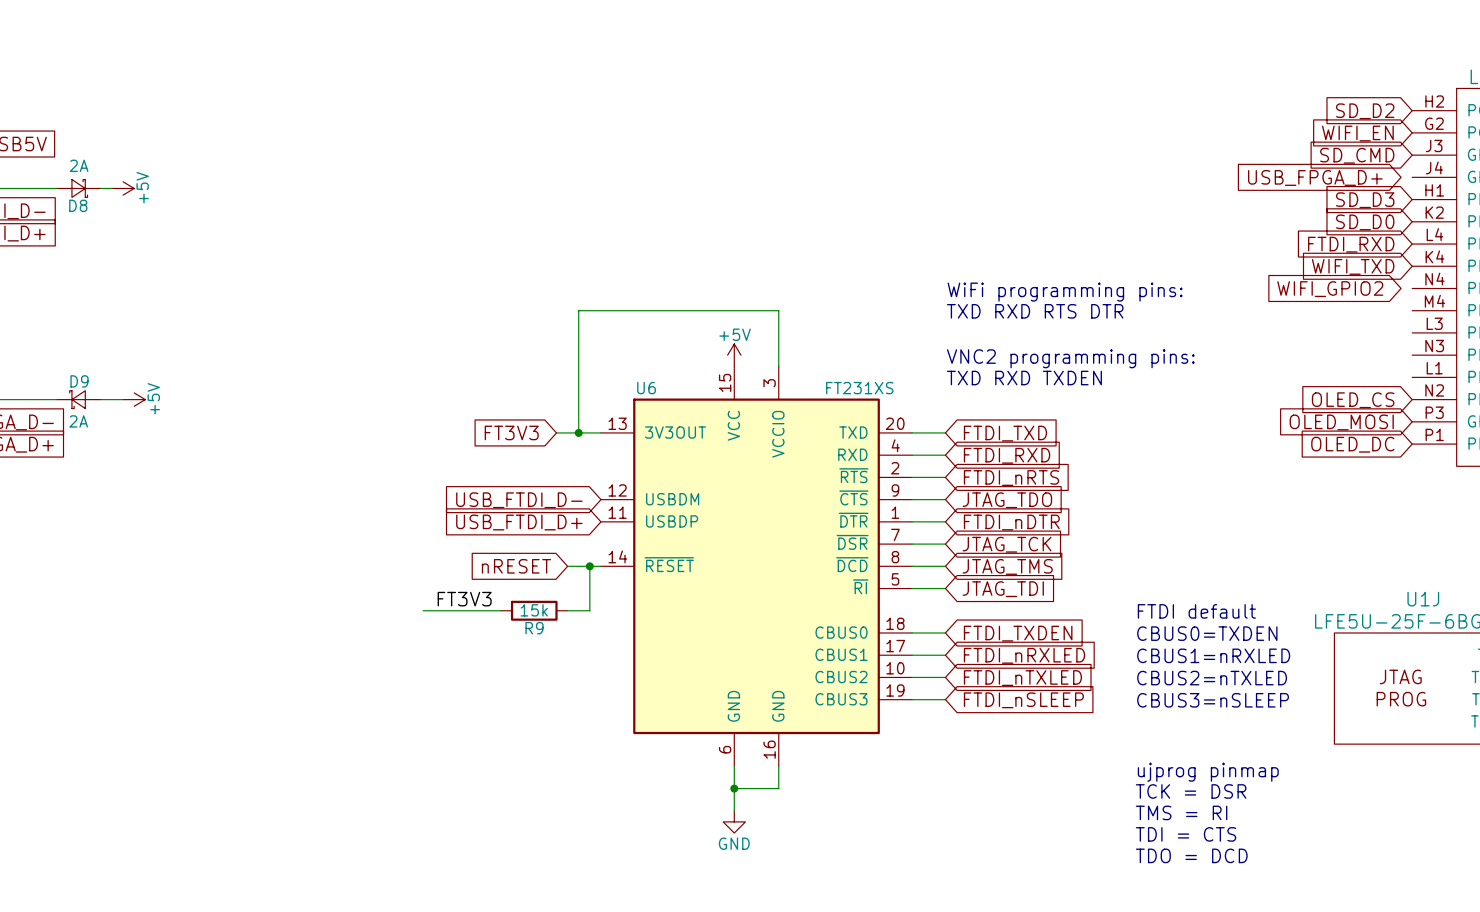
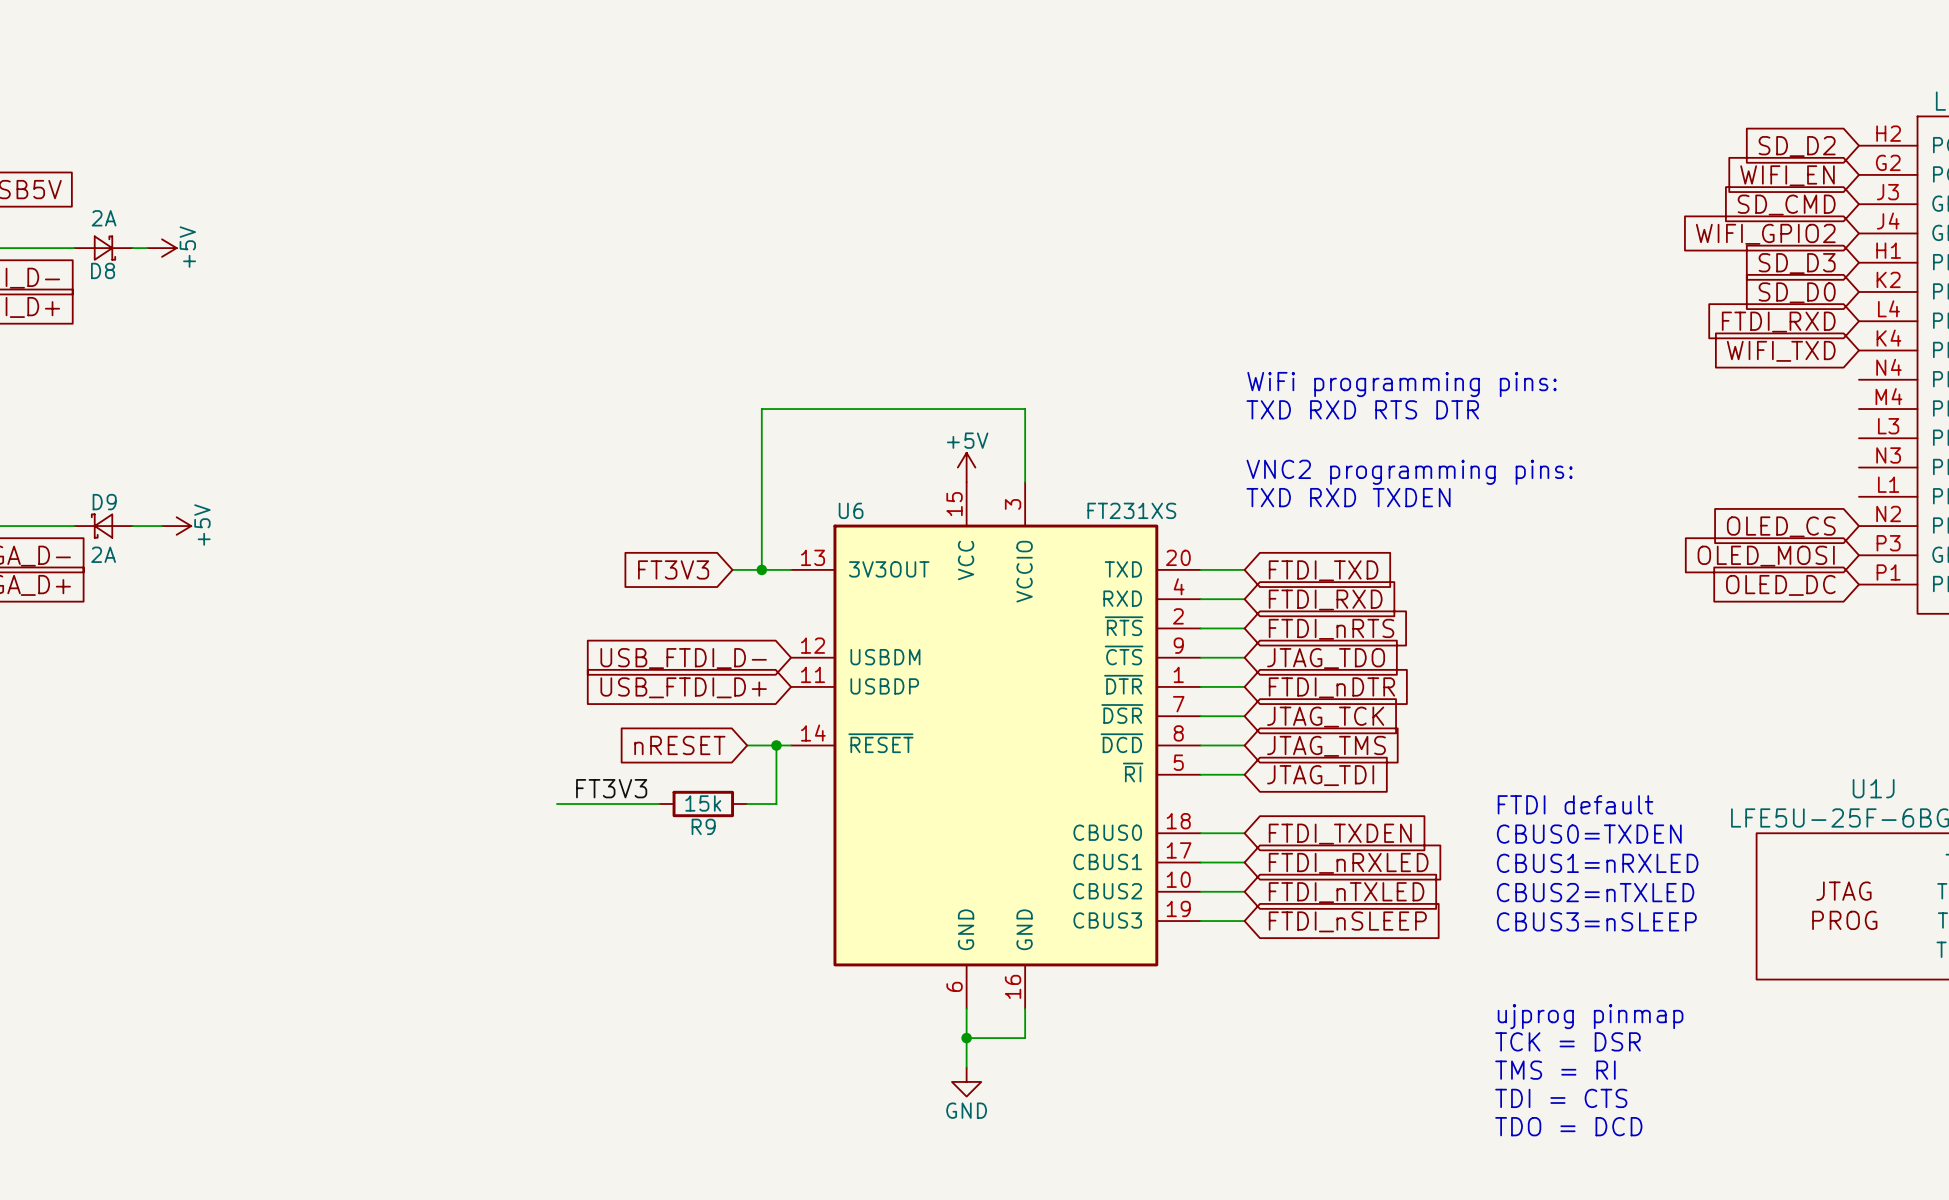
global label: USB_FPGA_D+ (1315, 177) -> none
global label position: WIFI_GPIO2 (1330, 289) -> WIFI_GPIO2 (1765, 234)

